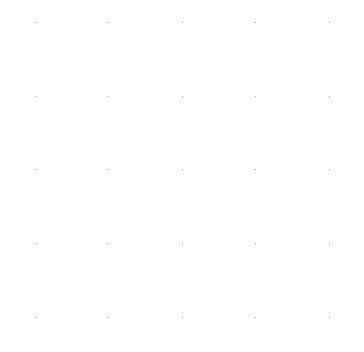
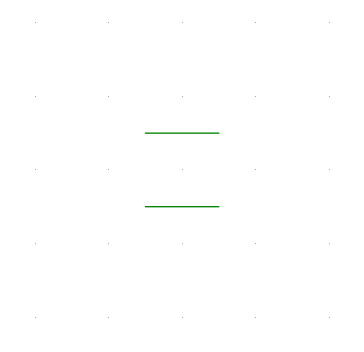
wire: none -> (145, 133) (218, 133)
wire: none -> (145, 206) (218, 206)

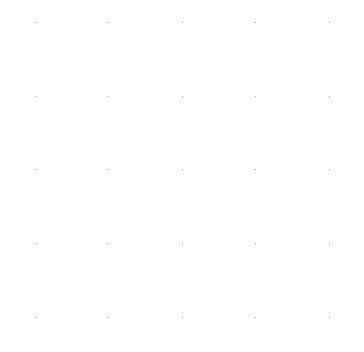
wire: (145, 133) (218, 133) -> none
wire: (145, 206) (218, 206) -> none

